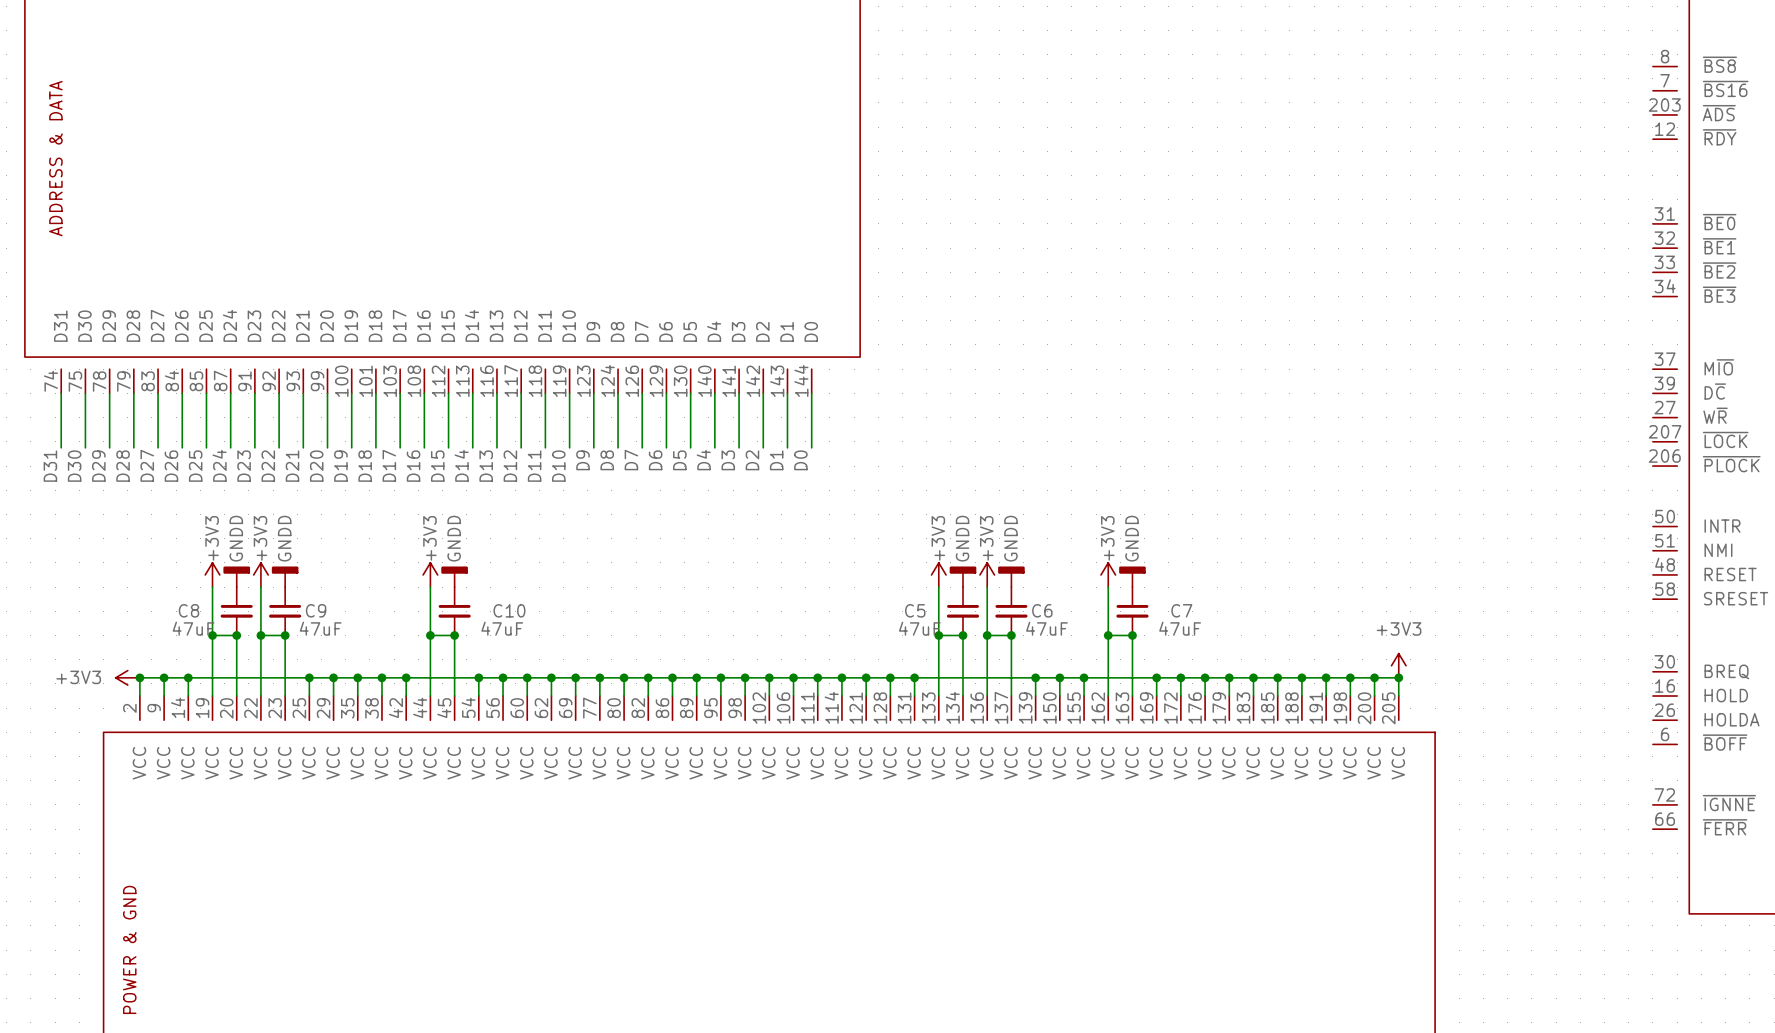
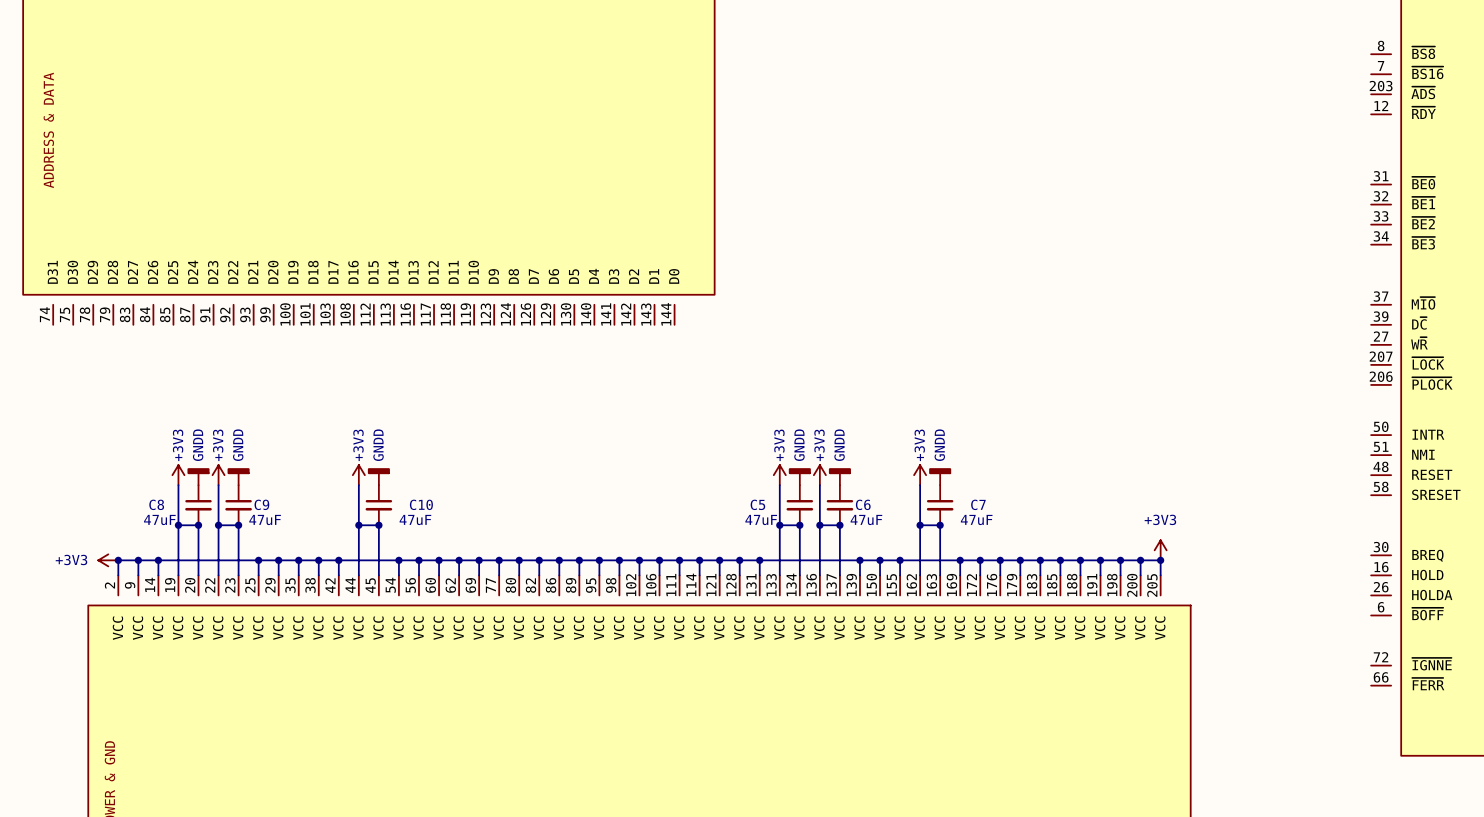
wire: (61, 393) (61, 447) -> none
wire: (85, 393) (85, 447) -> none
wire: (109, 393) (109, 447) -> none
wire: (133, 393) (133, 447) -> none
wire: (158, 393) (158, 447) -> none
wire: (182, 393) (182, 447) -> none
wire: (206, 393) (206, 447) -> none
wire: (230, 393) (230, 447) -> none
wire: (254, 393) (254, 447) -> none
wire: (279, 393) (279, 447) -> none
wire: (303, 393) (303, 447) -> none
wire: (327, 393) (327, 447) -> none
wire: (351, 393) (351, 447) -> none
wire: (375, 393) (375, 447) -> none
wire: (400, 393) (400, 447) -> none
wire: (424, 393) (424, 447) -> none
wire: (448, 393) (448, 447) -> none
wire: (472, 393) (472, 447) -> none
wire: (496, 393) (496, 447) -> none
wire: (521, 393) (521, 447) -> none
wire: (545, 393) (545, 447) -> none
wire: (569, 393) (569, 447) -> none
wire: (593, 393) (593, 447) -> none
wire: (618, 393) (618, 447) -> none
wire: (642, 393) (642, 447) -> none
wire: (666, 393) (666, 447) -> none
wire: (690, 393) (690, 447) -> none
wire: (714, 393) (714, 447) -> none
wire: (739, 393) (739, 447) -> none
wire: (763, 393) (763, 447) -> none
wire: (787, 393) (787, 447) -> none
wire: (811, 393) (811, 447) -> none
label: D9 (583, 460) -> none
label: D8 (607, 460) -> none
label: D7 (631, 460) -> none
label: D6 (655, 460) -> none
label: D5 (679, 460) -> none
label: D4 (703, 460) -> none
label: D3 (728, 460) -> none
label: D2 (752, 460) -> none
label: D1 (776, 460) -> none
label: D0 (800, 460) -> none
label: D27 (147, 465) -> none
label: D24 (219, 465) -> none
label: D17 (389, 465) -> none
label: D14 (461, 465) -> none
label: D31 (50, 466) -> none
label: D30 (74, 466) -> none
label: D29 (98, 466) -> none
label: D28 (123, 466) -> none
label: D26 (171, 466) -> none
label: D25 (195, 466) -> none
label: D23 (244, 466) -> none
label: D22 (268, 466) -> none
label: D21 (292, 466) -> none
label: D20 (316, 466) -> none
label: D19 (340, 466) -> none
label: D18 (365, 466) -> none
label: D16 (413, 466) -> none
label: D15 (437, 466) -> none
label: D13 (486, 466) -> none
label: D12 (510, 466) -> none
label: D11 (534, 466) -> none
label: D10 (558, 466) -> none

